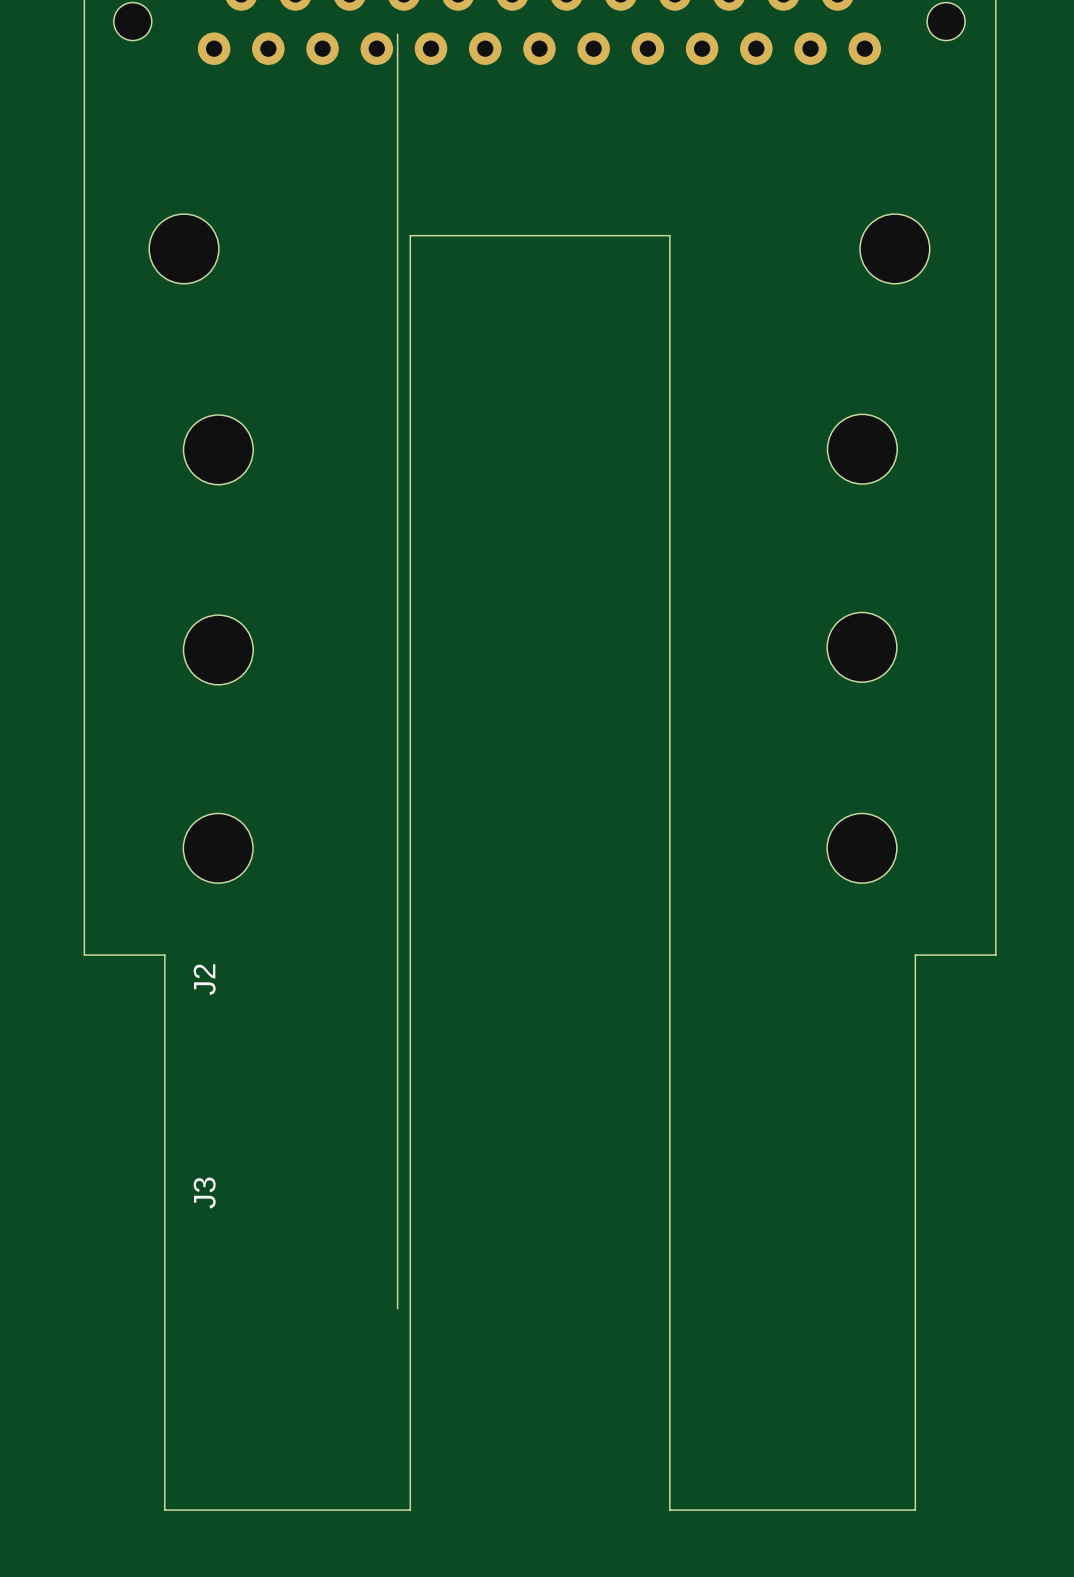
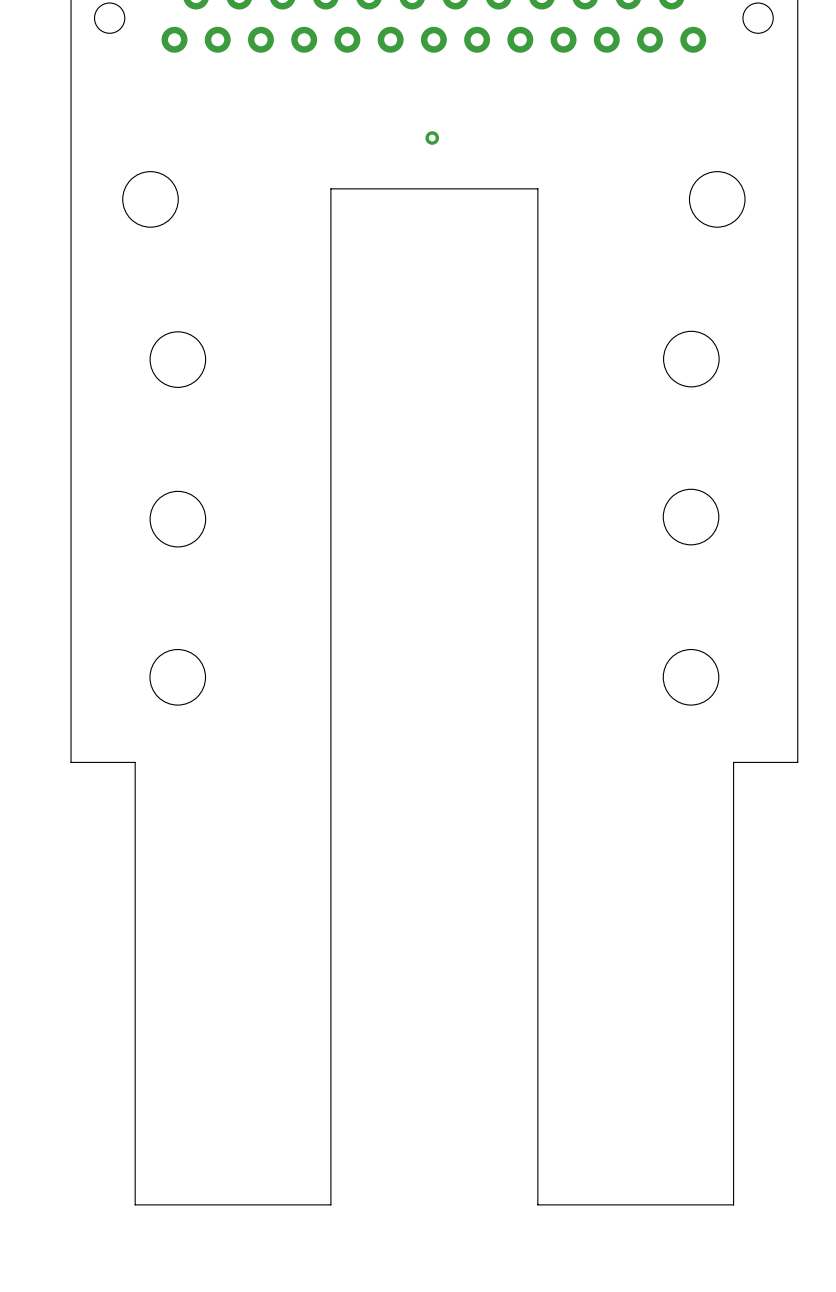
board edge: (397, 34) (397, 1308) -> none
part: none -> (432, 138)
text: J2 (204, 979) -> none
text: J3 (204, 1193) -> none

